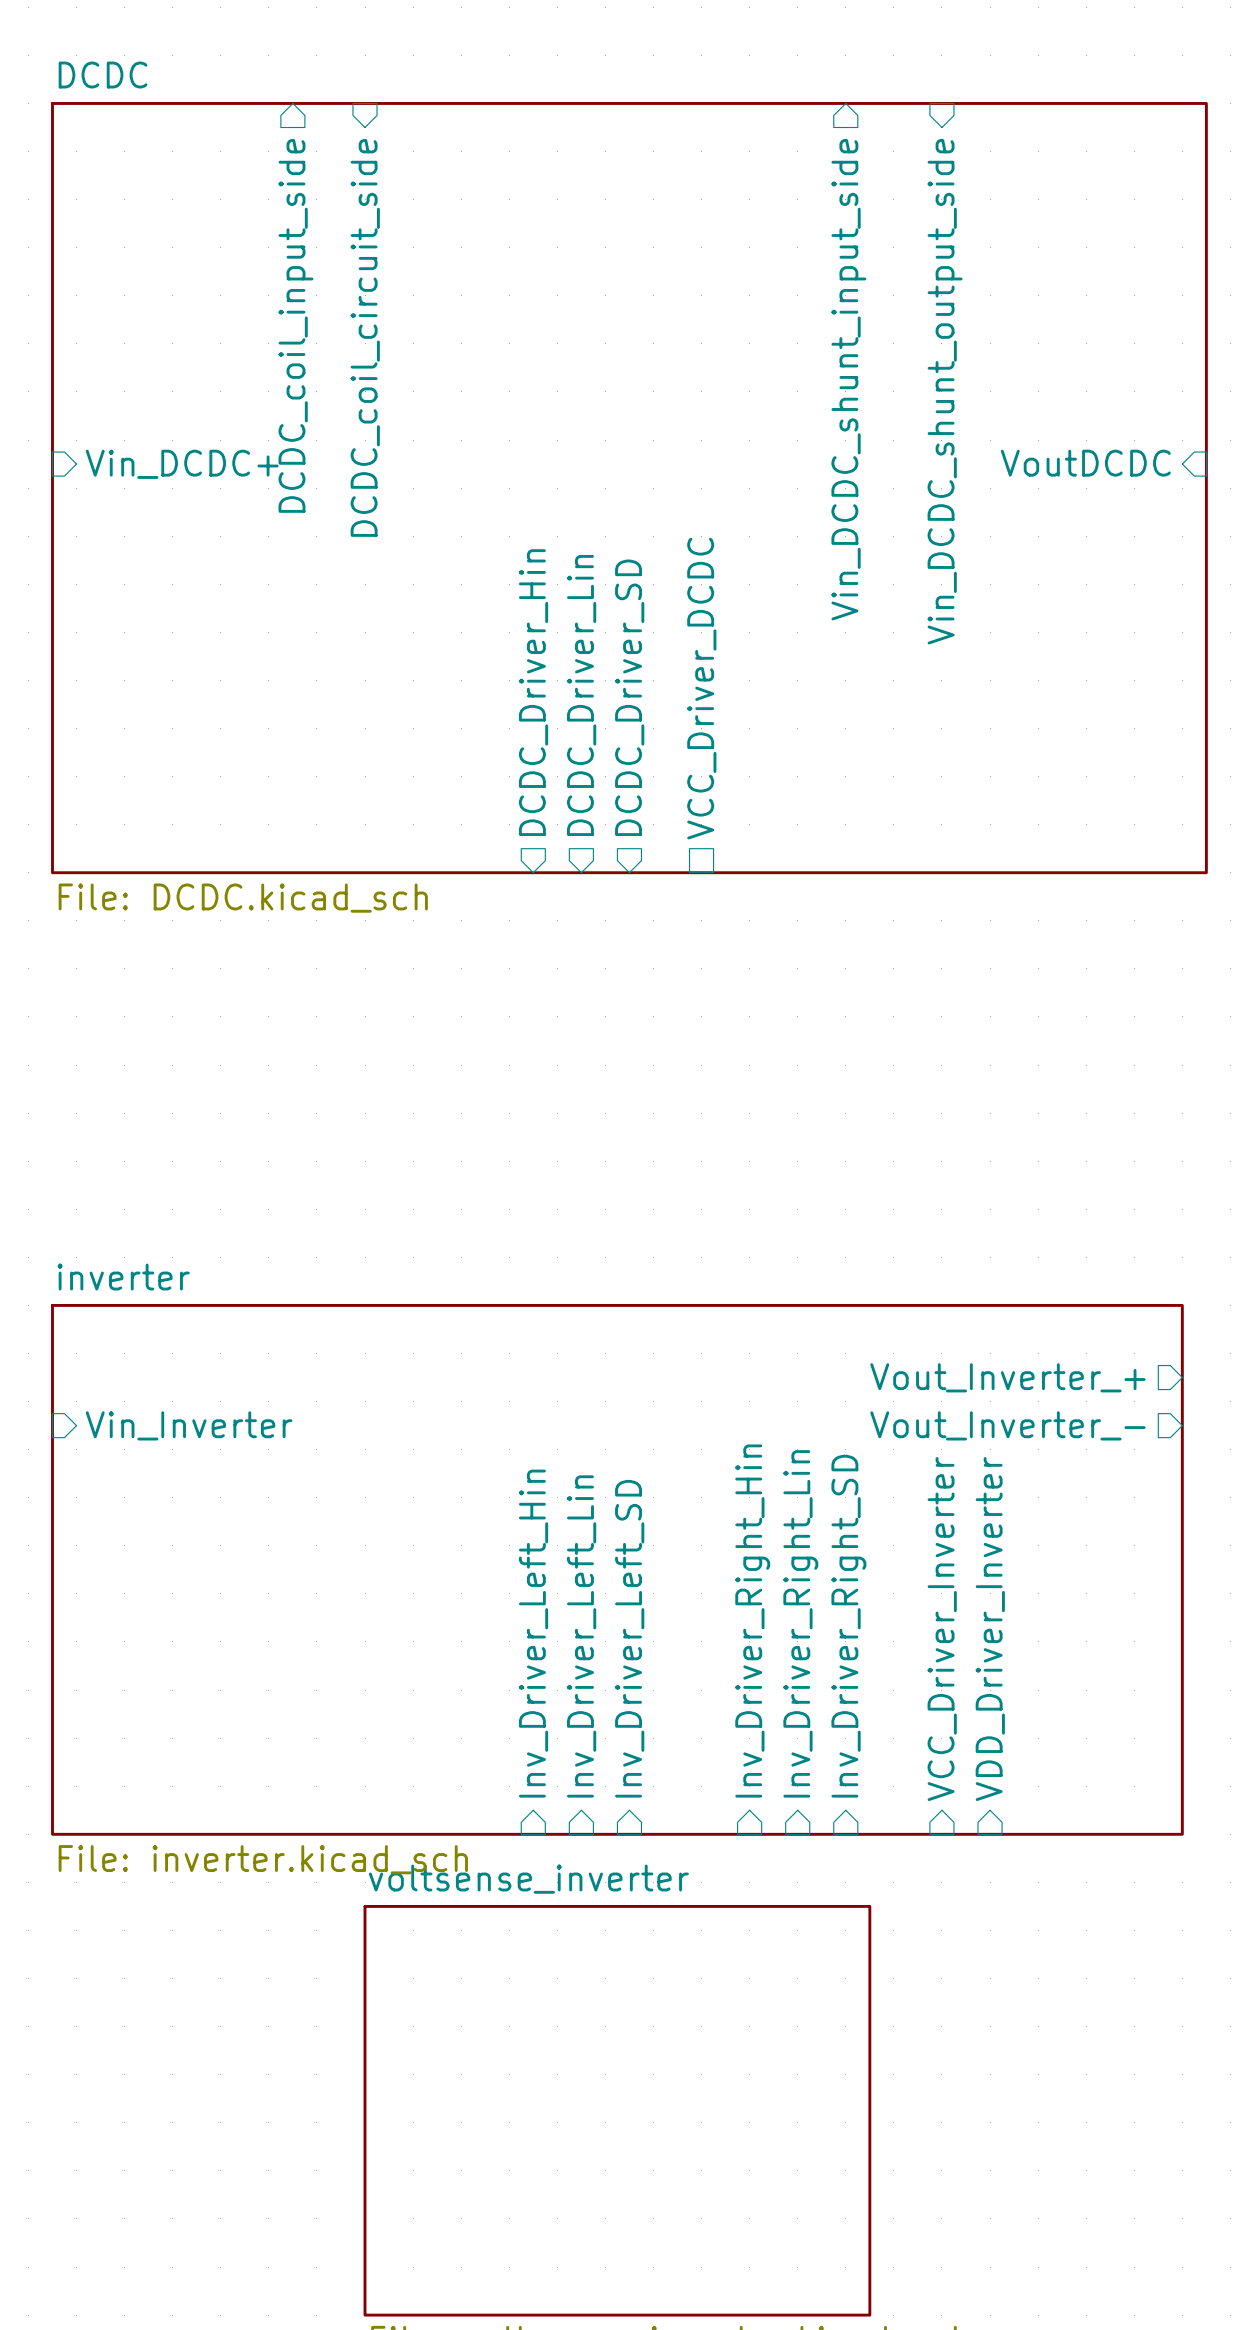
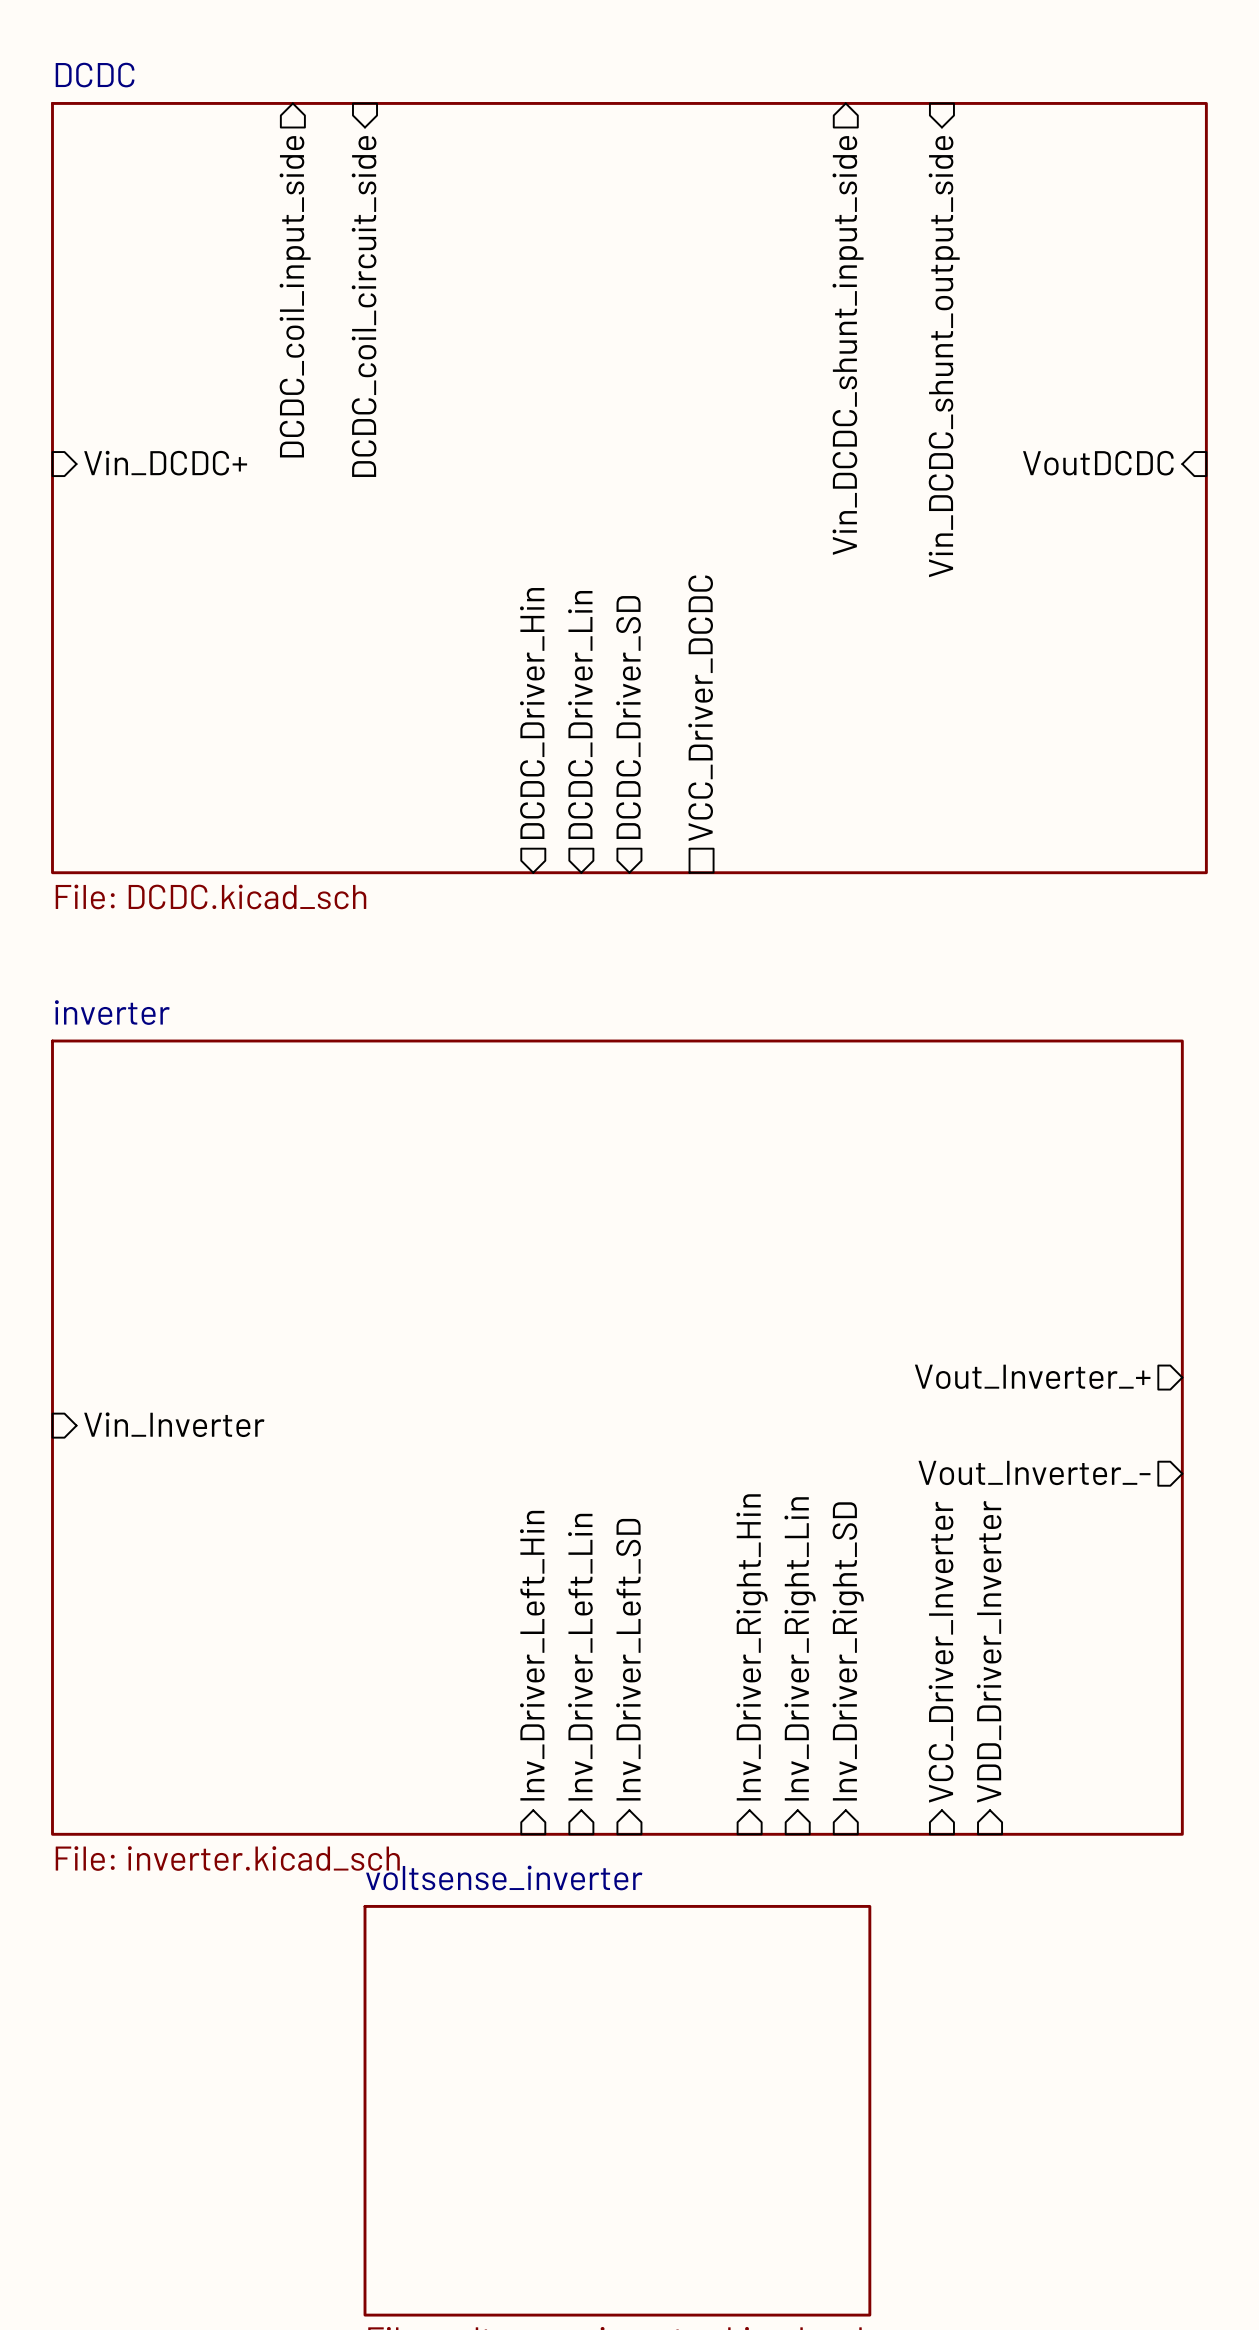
sheet pin position: Vout_Inverter_- (1007, 1425) -> Vout_Inverter_- (1034, 1472)
sheet inverter: none -> File: inverter.kicad_sch (617, 1437)
sheet inverter: File: inverter.kicad_sch (617, 1569) -> none

